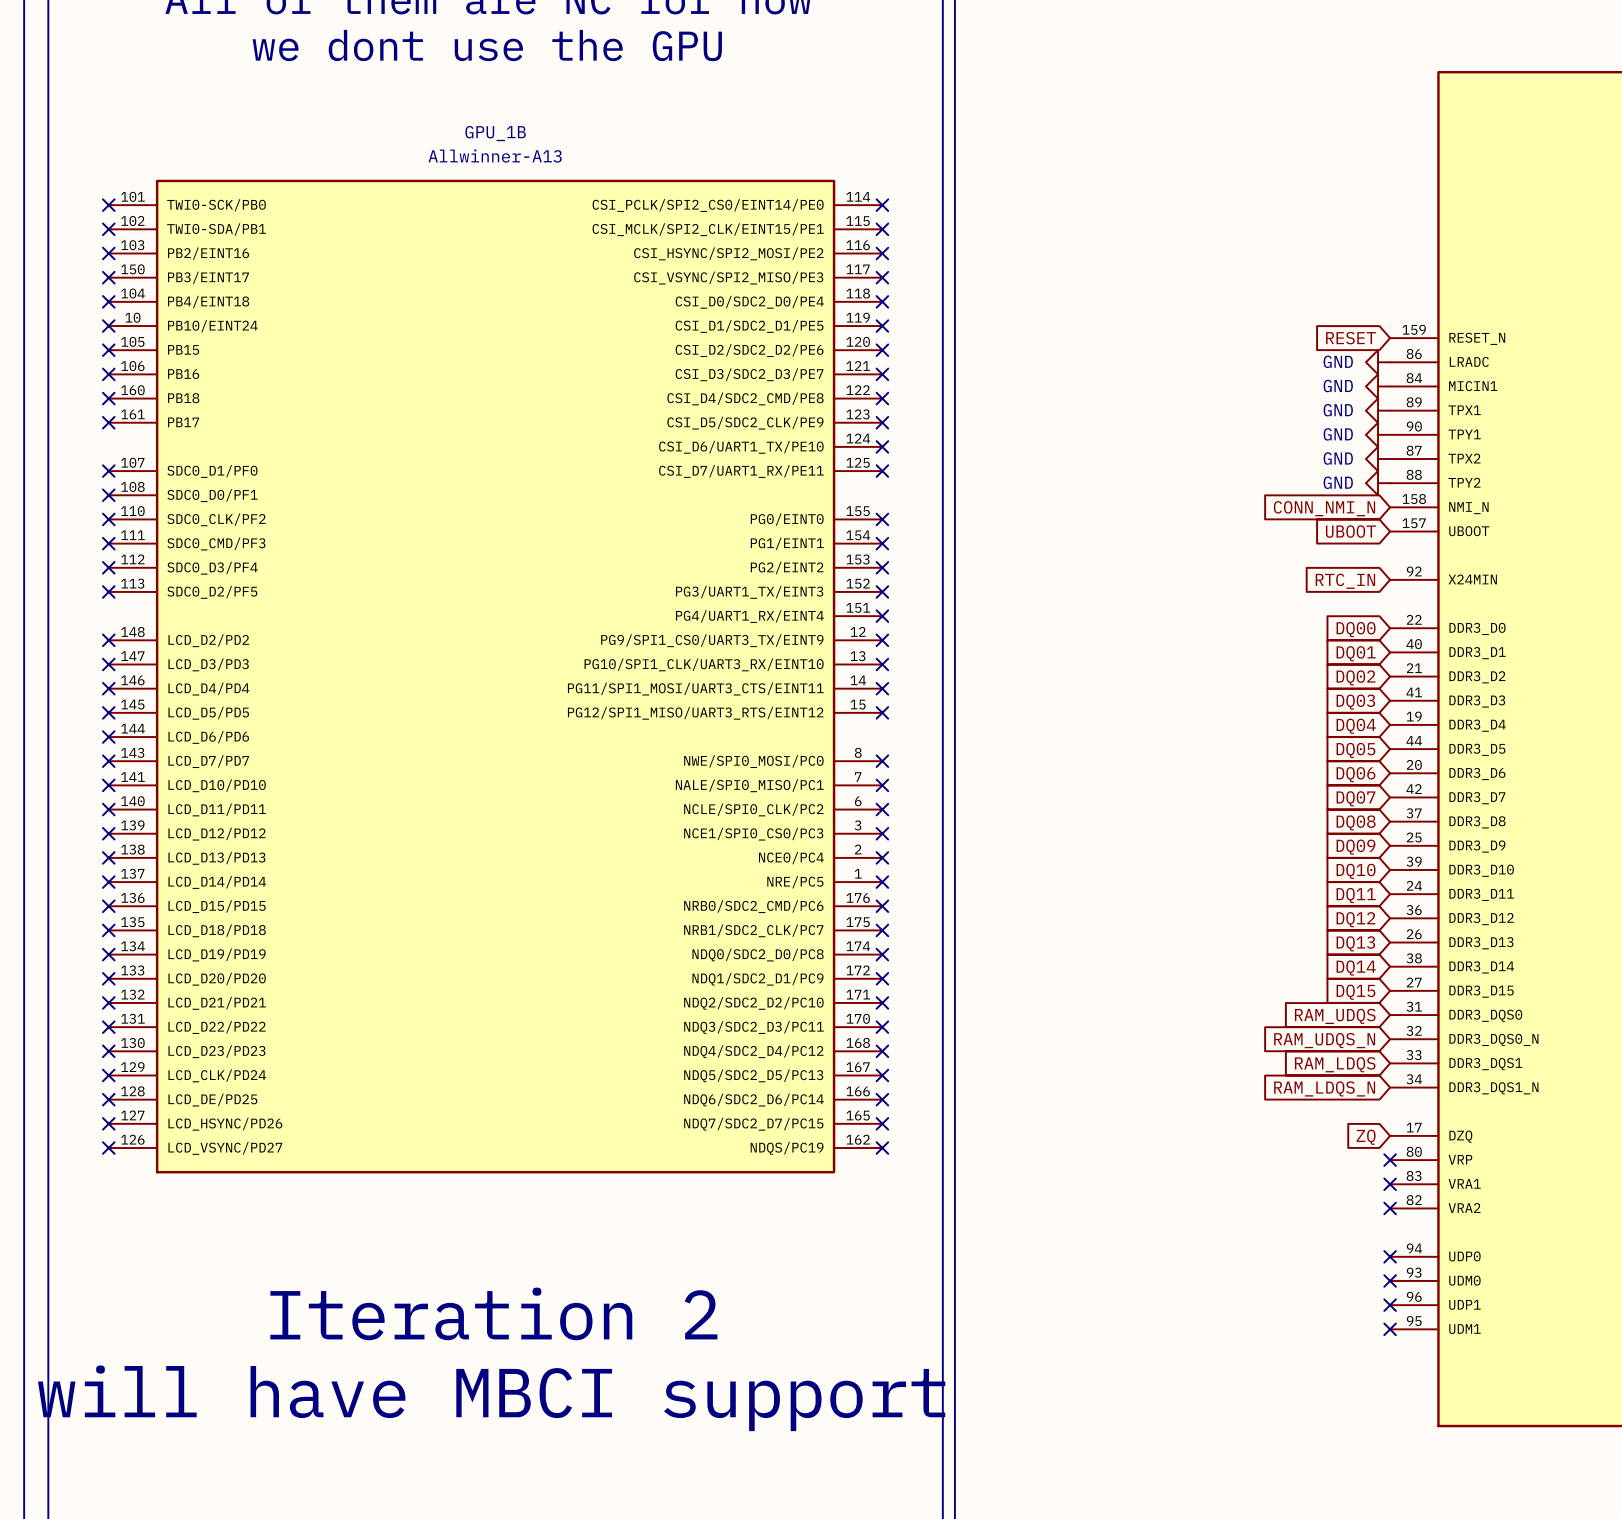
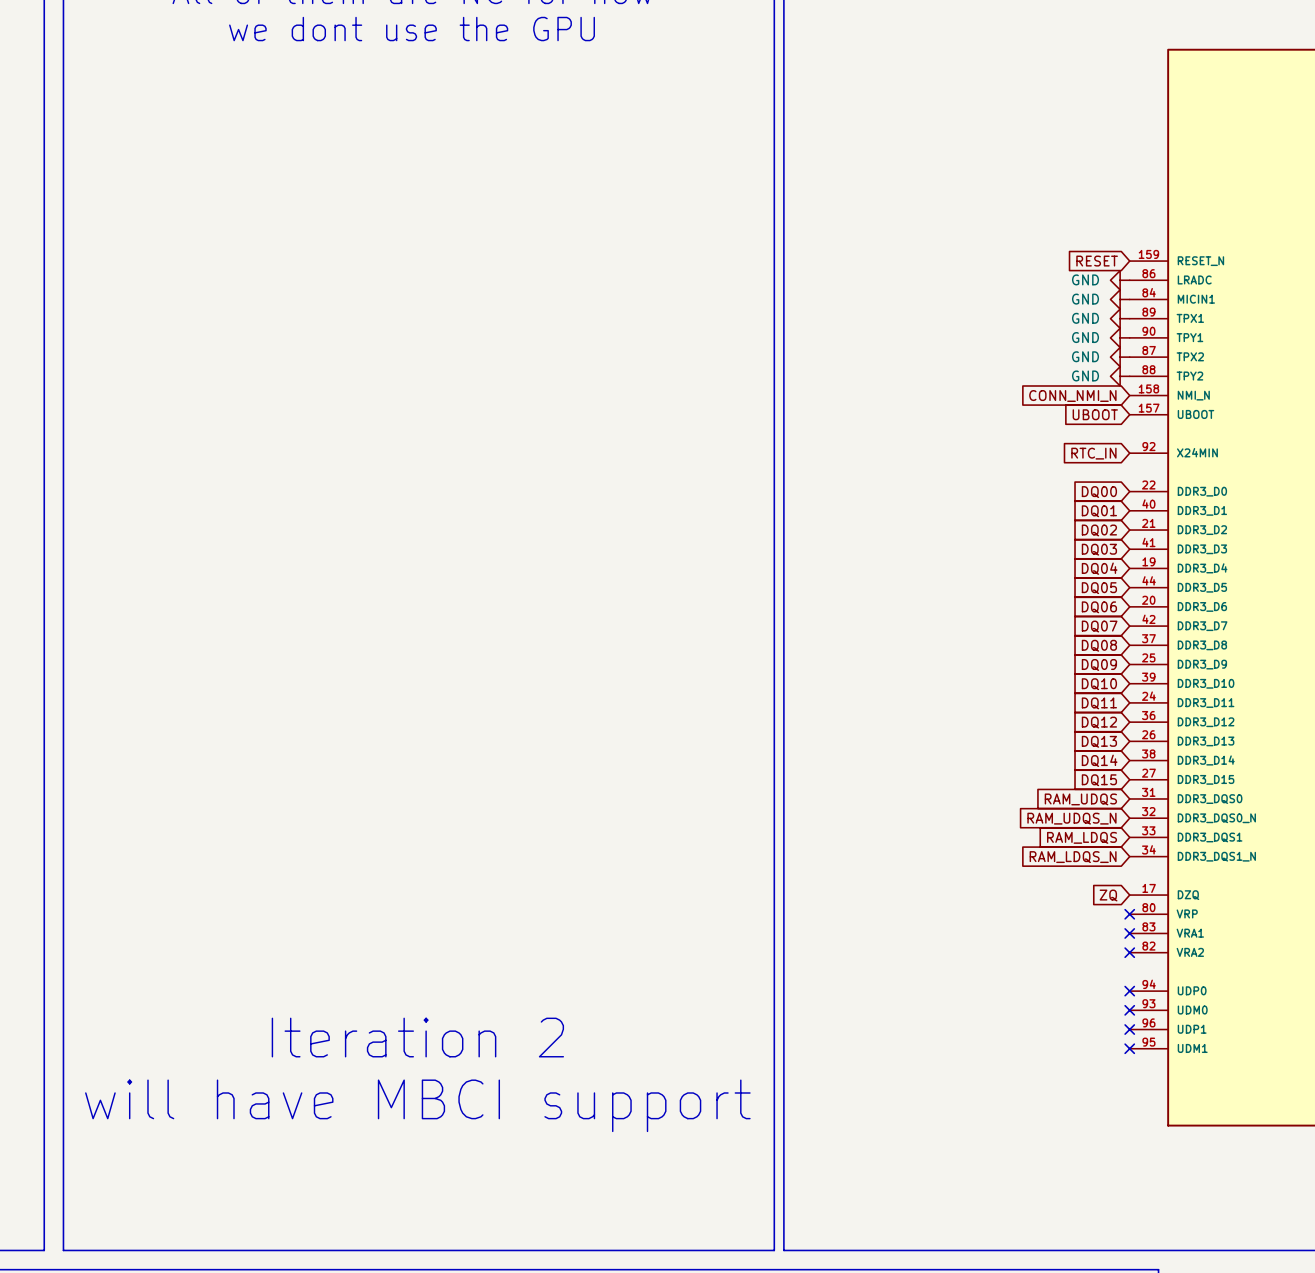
no-connect mark: (108, 205) -> none
no-connect mark: (882, 205) -> none
no-connect mark: (108, 229) -> none
no-connect mark: (882, 229) -> none
no-connect mark: (108, 253) -> none
no-connect mark: (882, 253) -> none
no-connect mark: (108, 277) -> none
no-connect mark: (882, 277) -> none
no-connect mark: (108, 301) -> none
no-connect mark: (882, 301) -> none
no-connect mark: (108, 326) -> none
no-connect mark: (882, 326) -> none
no-connect mark: (108, 350) -> none
no-connect mark: (882, 350) -> none
no-connect mark: (108, 374) -> none
no-connect mark: (882, 374) -> none
no-connect mark: (108, 398) -> none
no-connect mark: (882, 398) -> none
no-connect mark: (108, 422) -> none
no-connect mark: (882, 422) -> none
no-connect mark: (882, 446) -> none
no-connect mark: (108, 471) -> none
no-connect mark: (882, 471) -> none
no-connect mark: (108, 495) -> none
no-connect mark: (108, 519) -> none
no-connect mark: (882, 519) -> none
no-connect mark: (108, 543) -> none
no-connect mark: (882, 543) -> none
no-connect mark: (108, 567) -> none
no-connect mark: (882, 567) -> none
no-connect mark: (108, 591) -> none
no-connect mark: (882, 591) -> none
no-connect mark: (882, 616) -> none
no-connect mark: (108, 640) -> none
no-connect mark: (882, 640) -> none
no-connect mark: (108, 664) -> none
no-connect mark: (882, 664) -> none
GPU_1B: Allwinner-A13 (495, 676) -> none
no-connect mark: (108, 688) -> none
no-connect mark: (882, 688) -> none
no-connect mark: (108, 712) -> none
no-connect mark: (882, 712) -> none
no-connect mark: (108, 737) -> none
no-connect mark: (108, 761) -> none
no-connect mark: (882, 761) -> none
no-connect mark: (108, 785) -> none
no-connect mark: (882, 785) -> none
no-connect mark: (108, 809) -> none
no-connect mark: (882, 809) -> none
no-connect mark: (108, 833) -> none
no-connect mark: (882, 833) -> none
no-connect mark: (108, 857) -> none
no-connect mark: (882, 857) -> none
no-connect mark: (108, 882) -> none
no-connect mark: (882, 882) -> none
no-connect mark: (108, 906) -> none
no-connect mark: (882, 906) -> none
no-connect mark: (108, 930) -> none
no-connect mark: (882, 930) -> none
no-connect mark: (108, 954) -> none
no-connect mark: (882, 954) -> none
no-connect mark: (108, 978) -> none
no-connect mark: (882, 978) -> none
no-connect mark: (108, 1002) -> none
no-connect mark: (882, 1002) -> none
no-connect mark: (108, 1027) -> none
no-connect mark: (882, 1027) -> none
no-connect mark: (108, 1051) -> none
no-connect mark: (882, 1051) -> none
no-connect mark: (108, 1075) -> none
no-connect mark: (882, 1075) -> none
no-connect mark: (108, 1099) -> none
no-connect mark: (882, 1099) -> none
no-connect mark: (108, 1123) -> none
no-connect mark: (882, 1123) -> none
no-connect mark: (108, 1148) -> none
no-connect mark: (882, 1148) -> none

